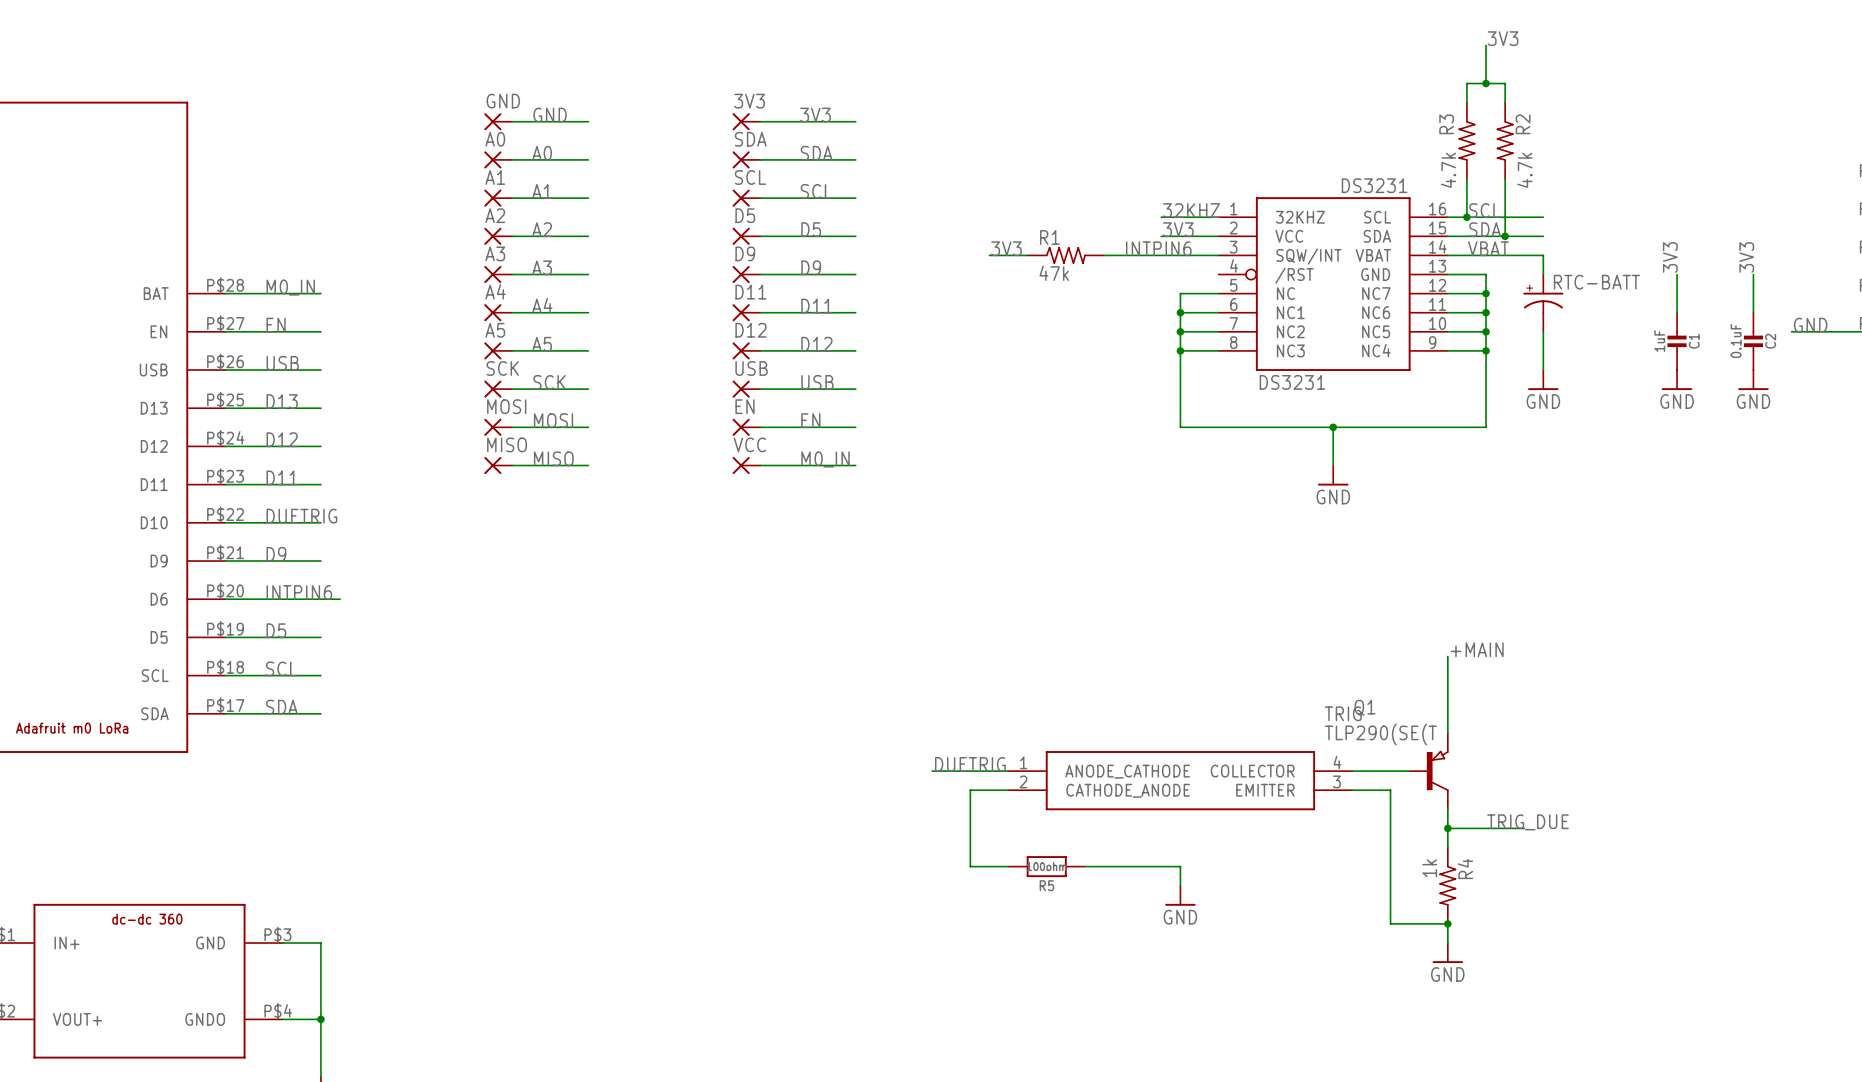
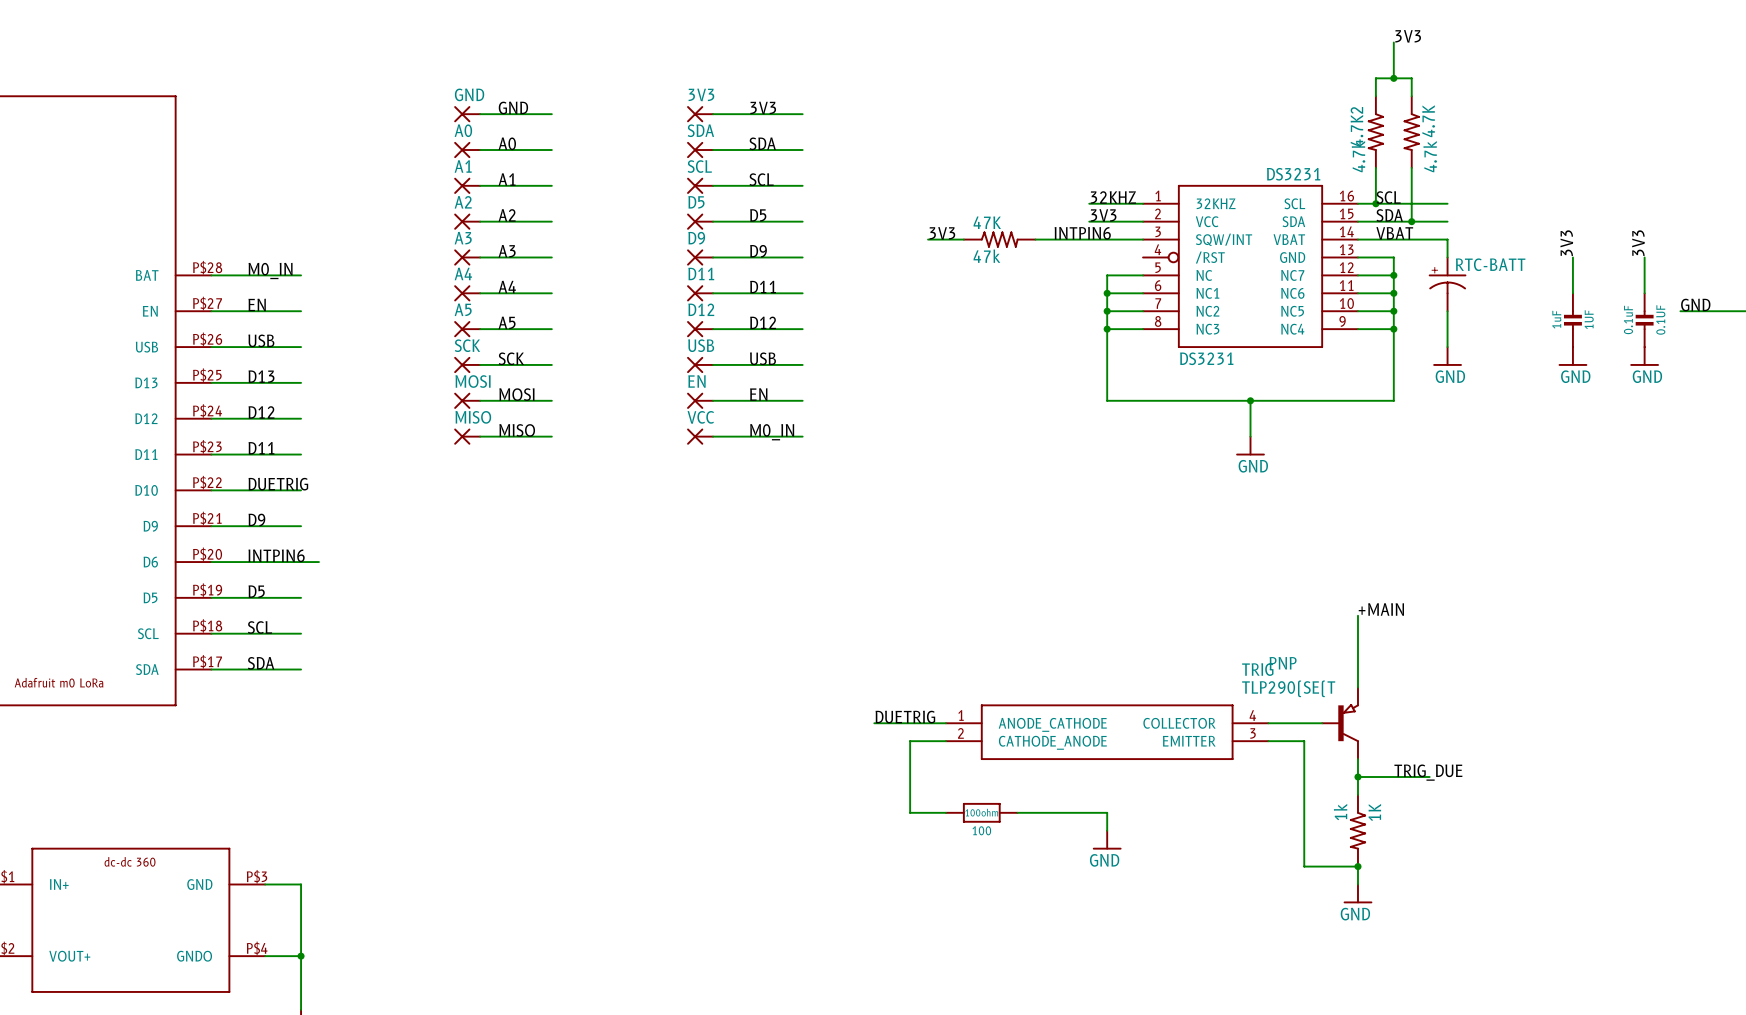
R3 name: R3 (1446, 124) -> 4.7K2 (1356, 126)
R2 name: R2 (1523, 124) -> 4.7K (1428, 121)
R1 name: R1 (1049, 237) -> 47K (987, 222)
C1 name: C1 (1694, 341) -> 1UF (1589, 319)
C2 name: C2 (1770, 341) -> 0.1UF (1660, 319)
Q1 name: Q1 (1365, 707) -> PNP (1283, 663)
R4 name: R4 (1465, 868) -> 1K (1374, 812)
R5 name: R5 (1046, 885) -> 100 (981, 830)

